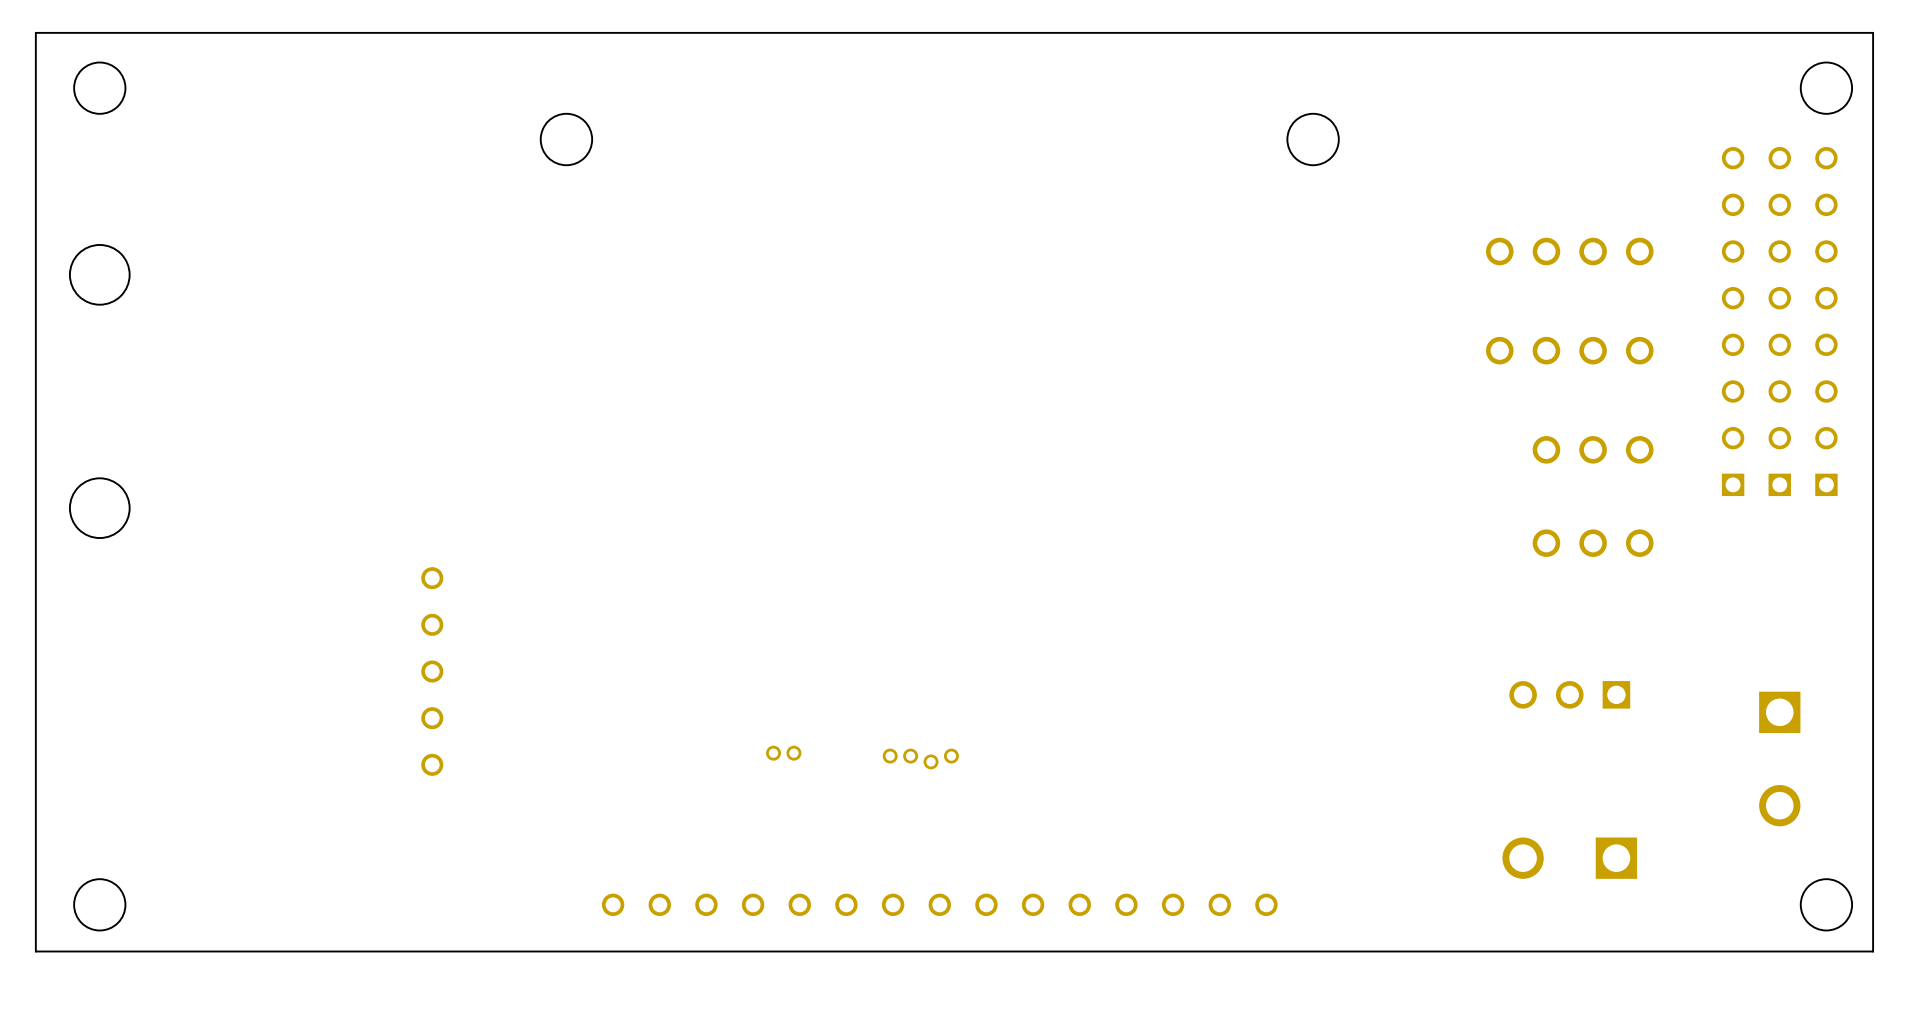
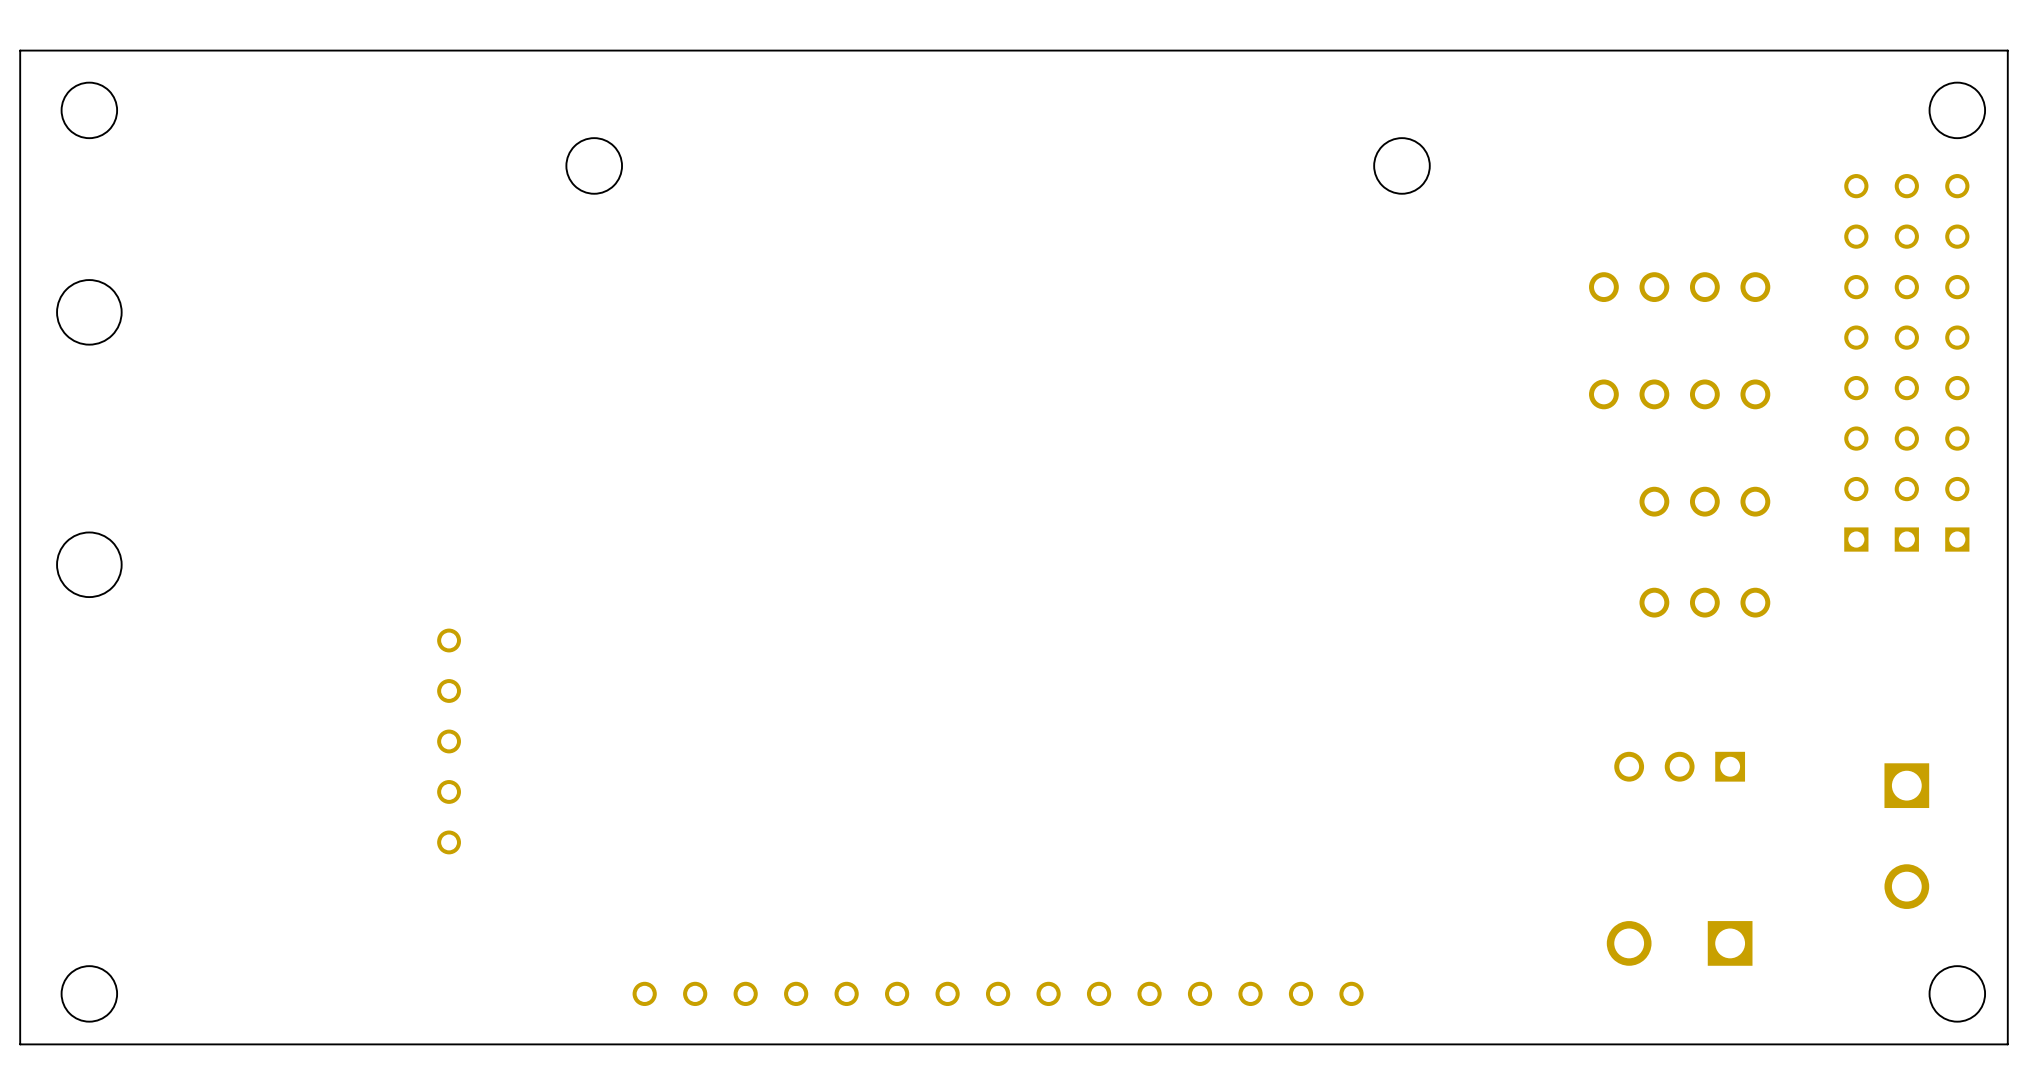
part: (773, 753) -> none
part: (793, 753) -> none
part: (890, 756) -> none
part: (910, 756) -> none
part: (951, 756) -> none
part: (931, 761) -> none

